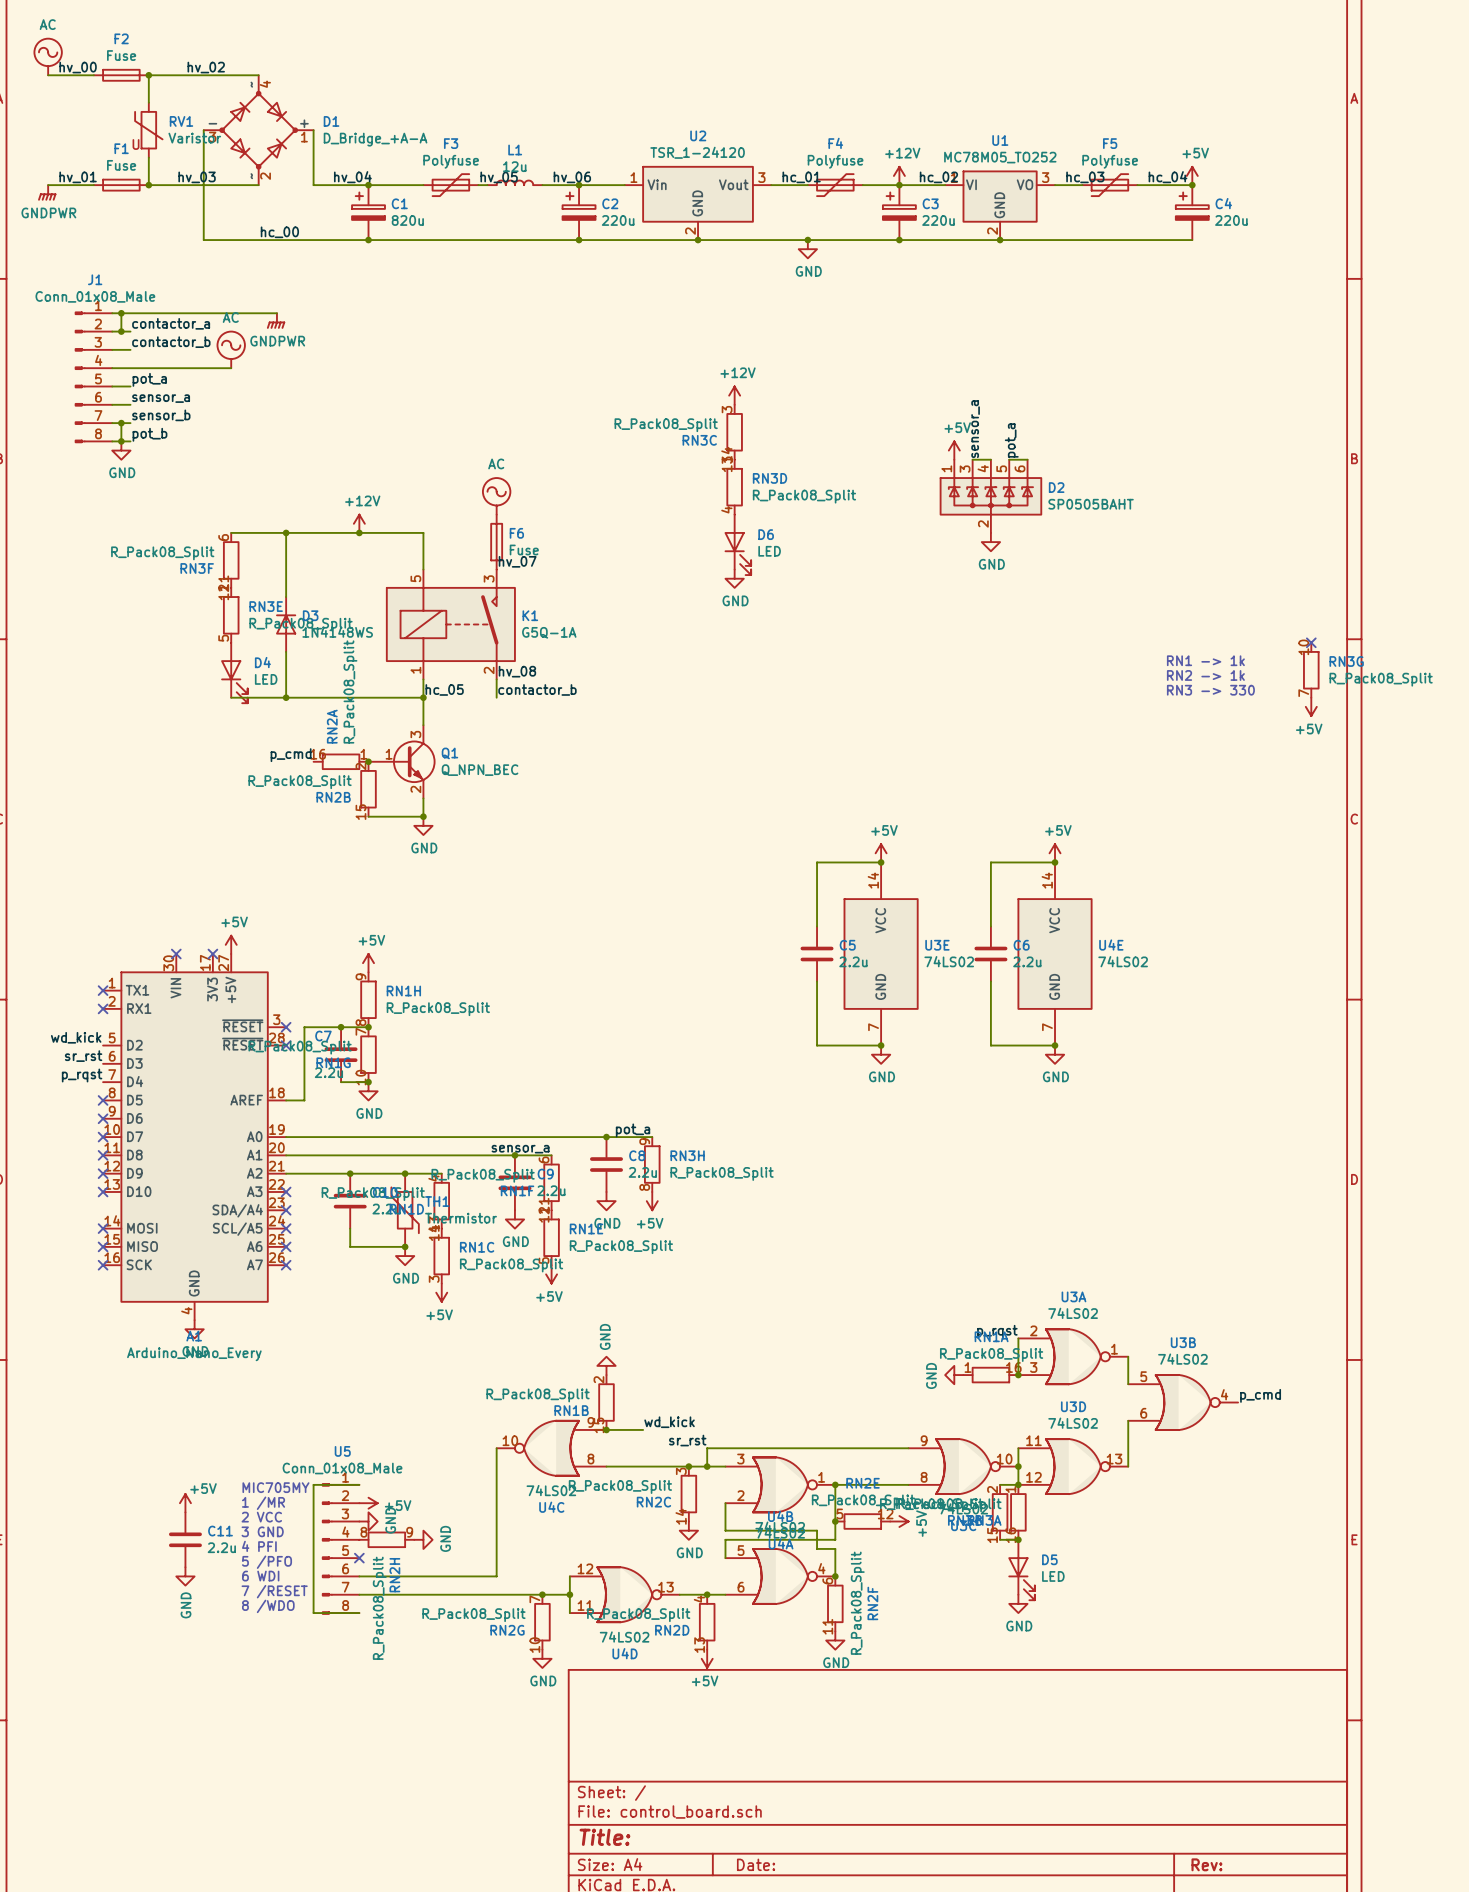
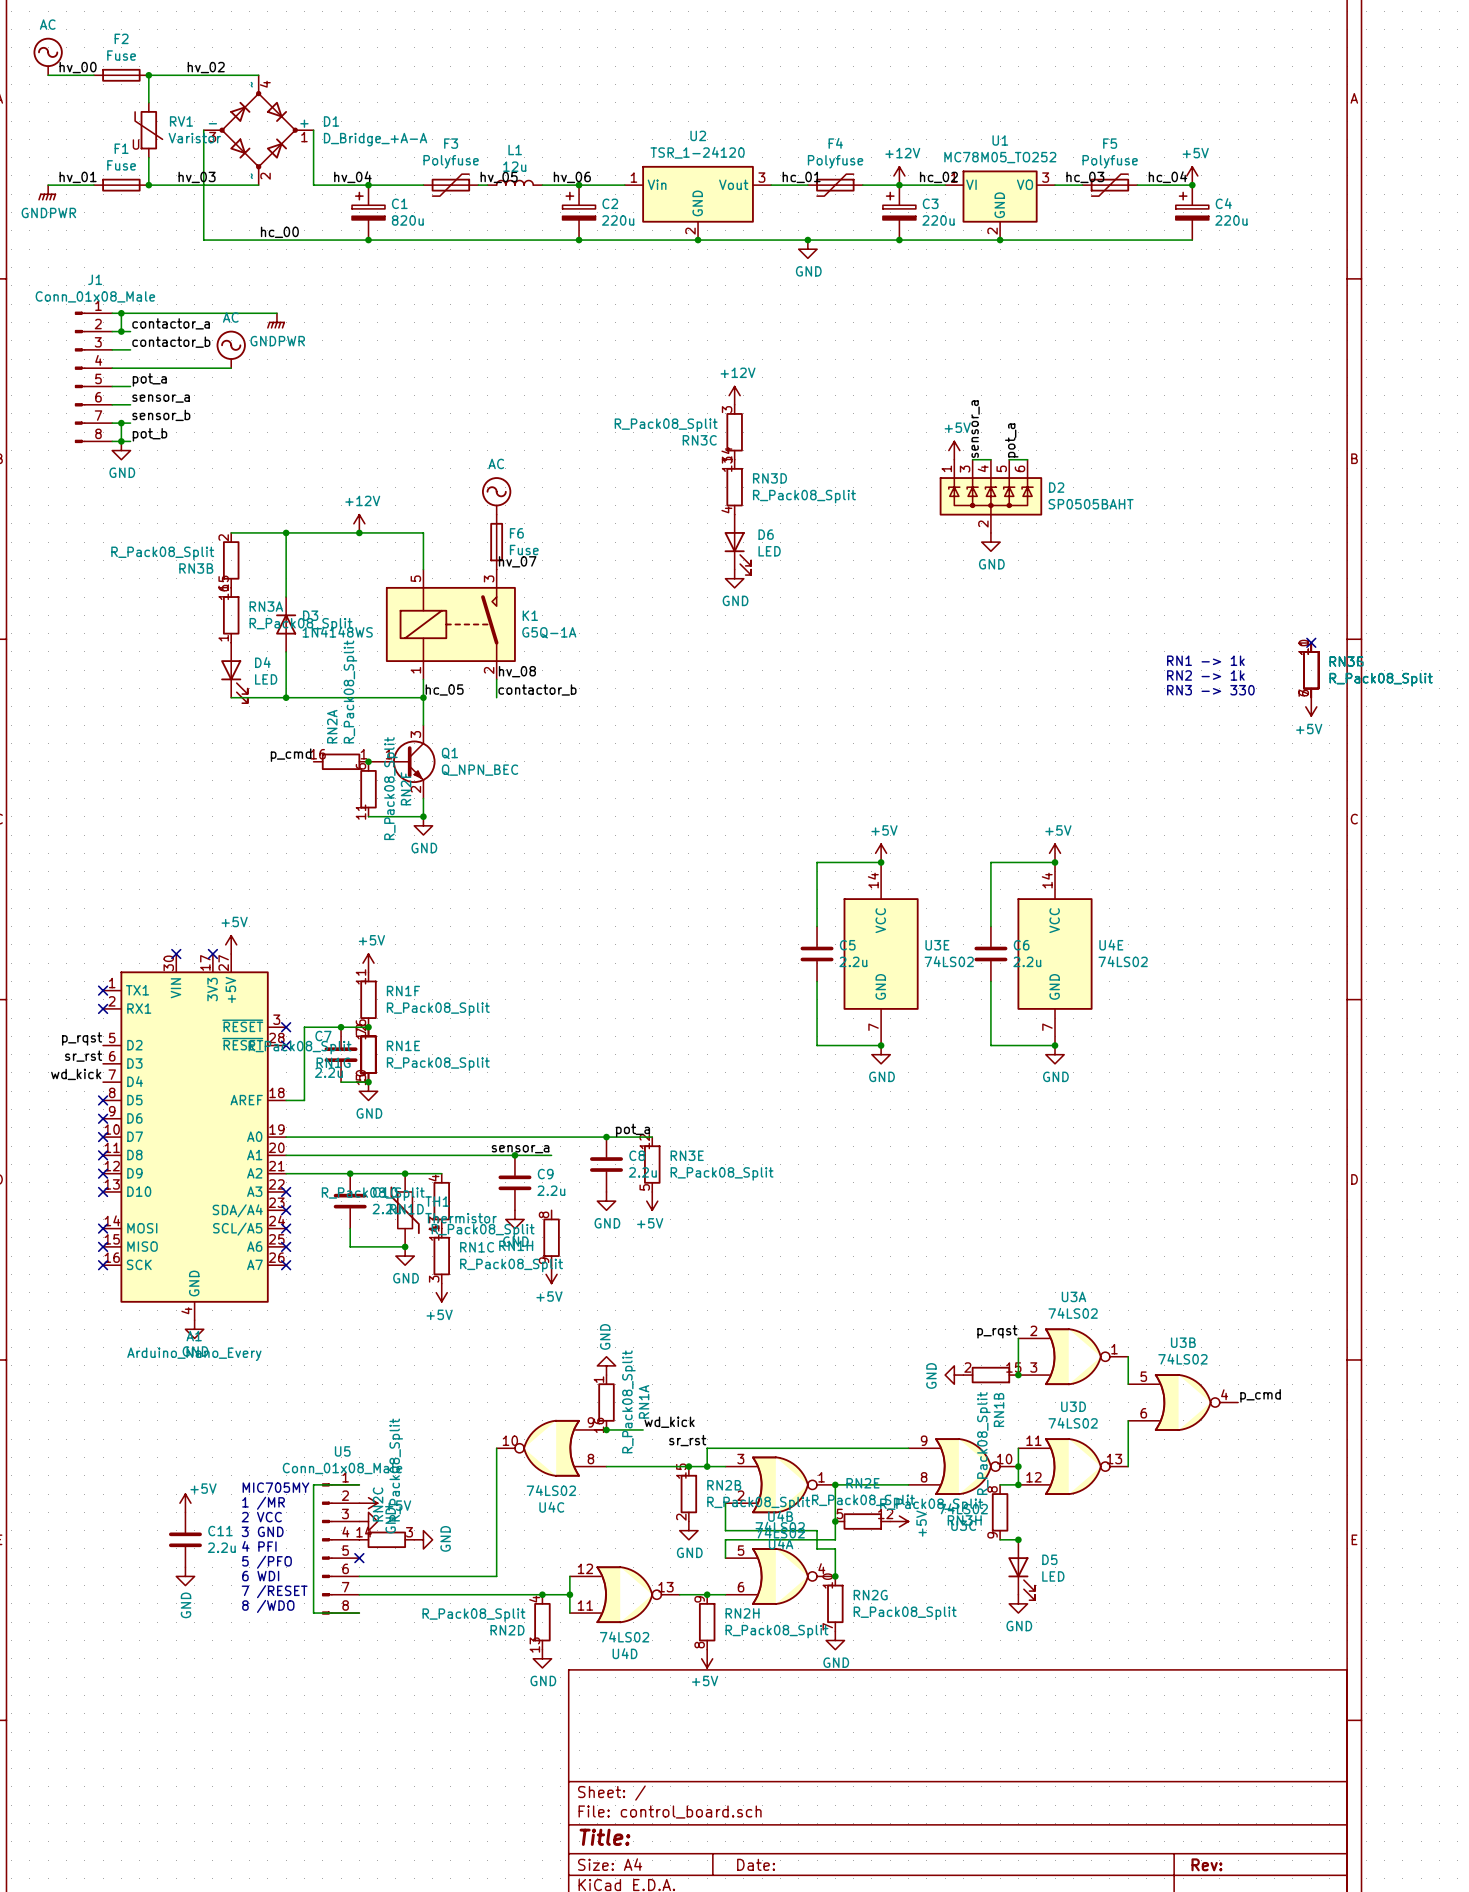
RN3F rotation: 0° (231, 560) -> 180° (1311, 670)
RN3F position: (231, 560) -> (1311, 670)
RN3E position: (231, 615) -> (652, 1164)
RN2B rotation: 0° (368, 789) -> 180° (688, 1494)
RN2B position: (368, 789) -> (688, 1494)
RN1H rotation: 0° (368, 999) -> 180° (551, 1237)
RN1H position: (368, 999) -> (551, 1237)
label: wd_kick (76, 1037) -> p_rqst (82, 1038)
label: p_rqst (82, 1075) -> wd_kick (76, 1074)
RN3H rotation: 0° (652, 1164) -> 180° (1000, 1512)
RN3H position: (652, 1164) -> (1000, 1512)
RN1F rotation: 0° (551, 1182) -> 180° (368, 999)
RN1F position: (551, 1182) -> (368, 999)
RN1E position: (551, 1237) -> (368, 1054)
RN1A rotation: 0° (990, 1375) -> 90° clockwise (606, 1402)
RN1A position: (990, 1375) -> (606, 1402)
RN1B rotation: 0° (606, 1402) -> 90° counterclockwise (990, 1375)
RN1B position: (606, 1402) -> (990, 1375)
RN2C rotation: 0° (688, 1494) -> 90° clockwise (386, 1539)
RN2C position: (688, 1494) -> (386, 1539)
RN3B position: (1000, 1512) -> (231, 560)
RN3A rotation: 0° (1018, 1512) -> 180° (231, 615)
RN3A position: (1018, 1512) -> (231, 615)
RN2H rotation: 0° (386, 1539) -> 90° counterclockwise (707, 1622)
RN2H position: (386, 1539) -> (707, 1622)
RN2F position: (835, 1603) -> (368, 789)
RN2G rotation: 0° (542, 1622) -> 180° (835, 1603)
RN2G position: (542, 1622) -> (835, 1603)
RN2D position: (707, 1622) -> (542, 1622)

